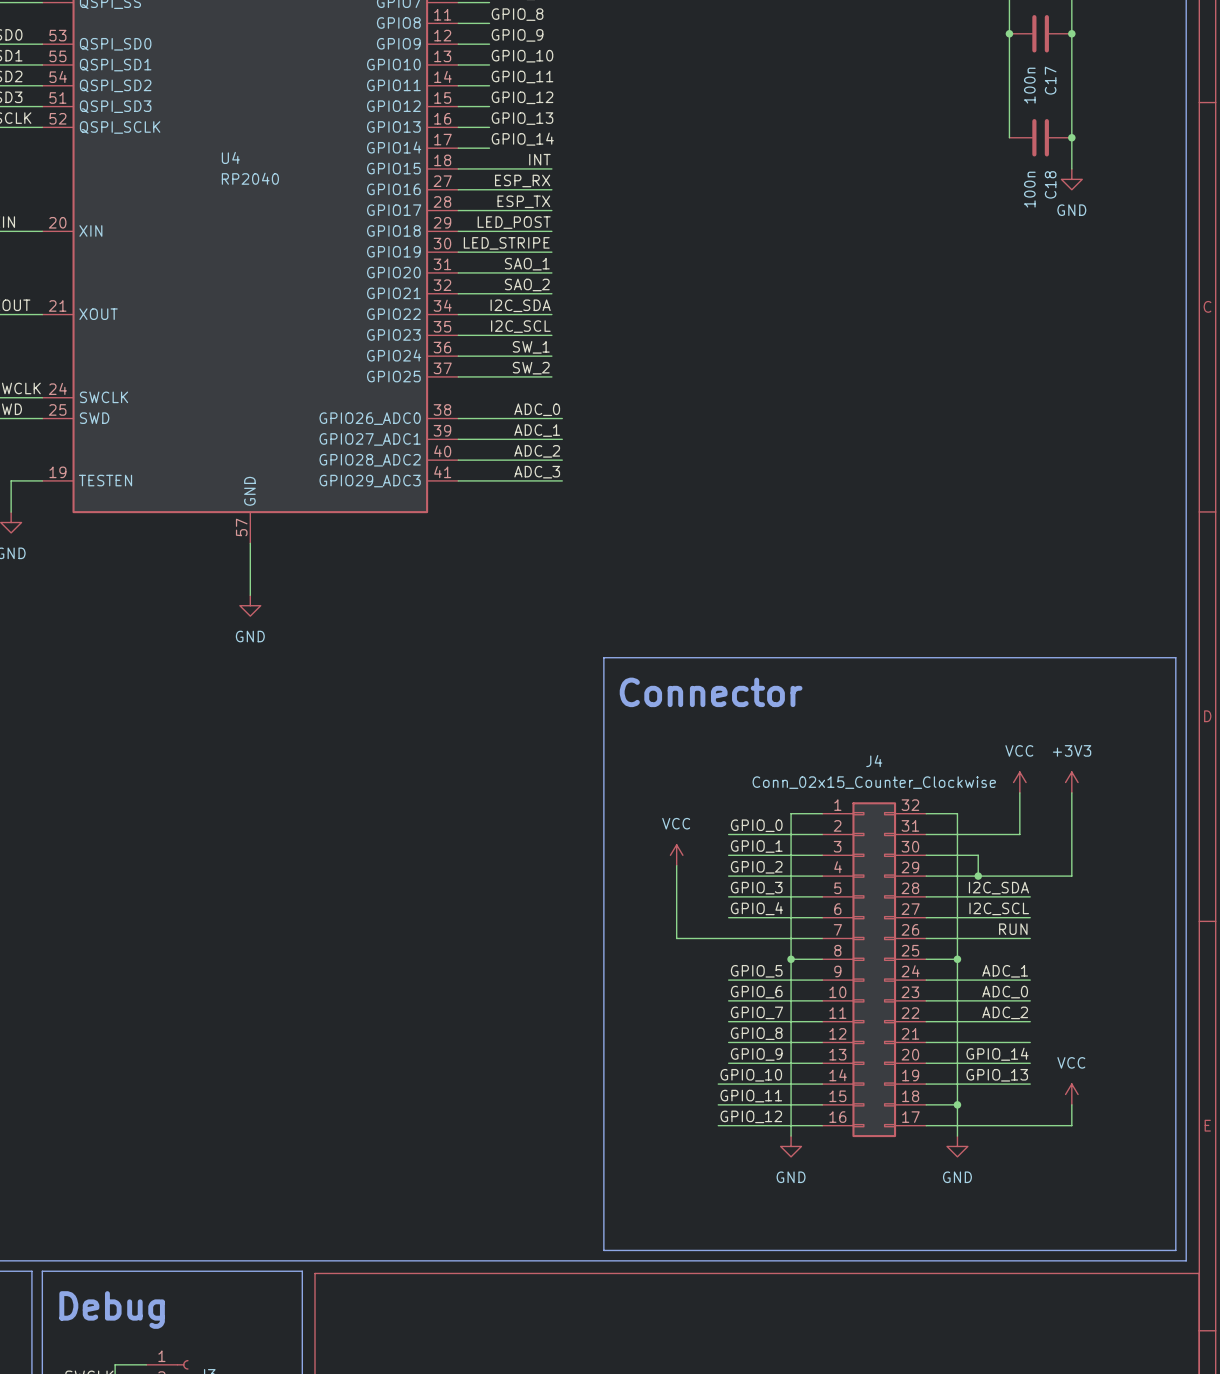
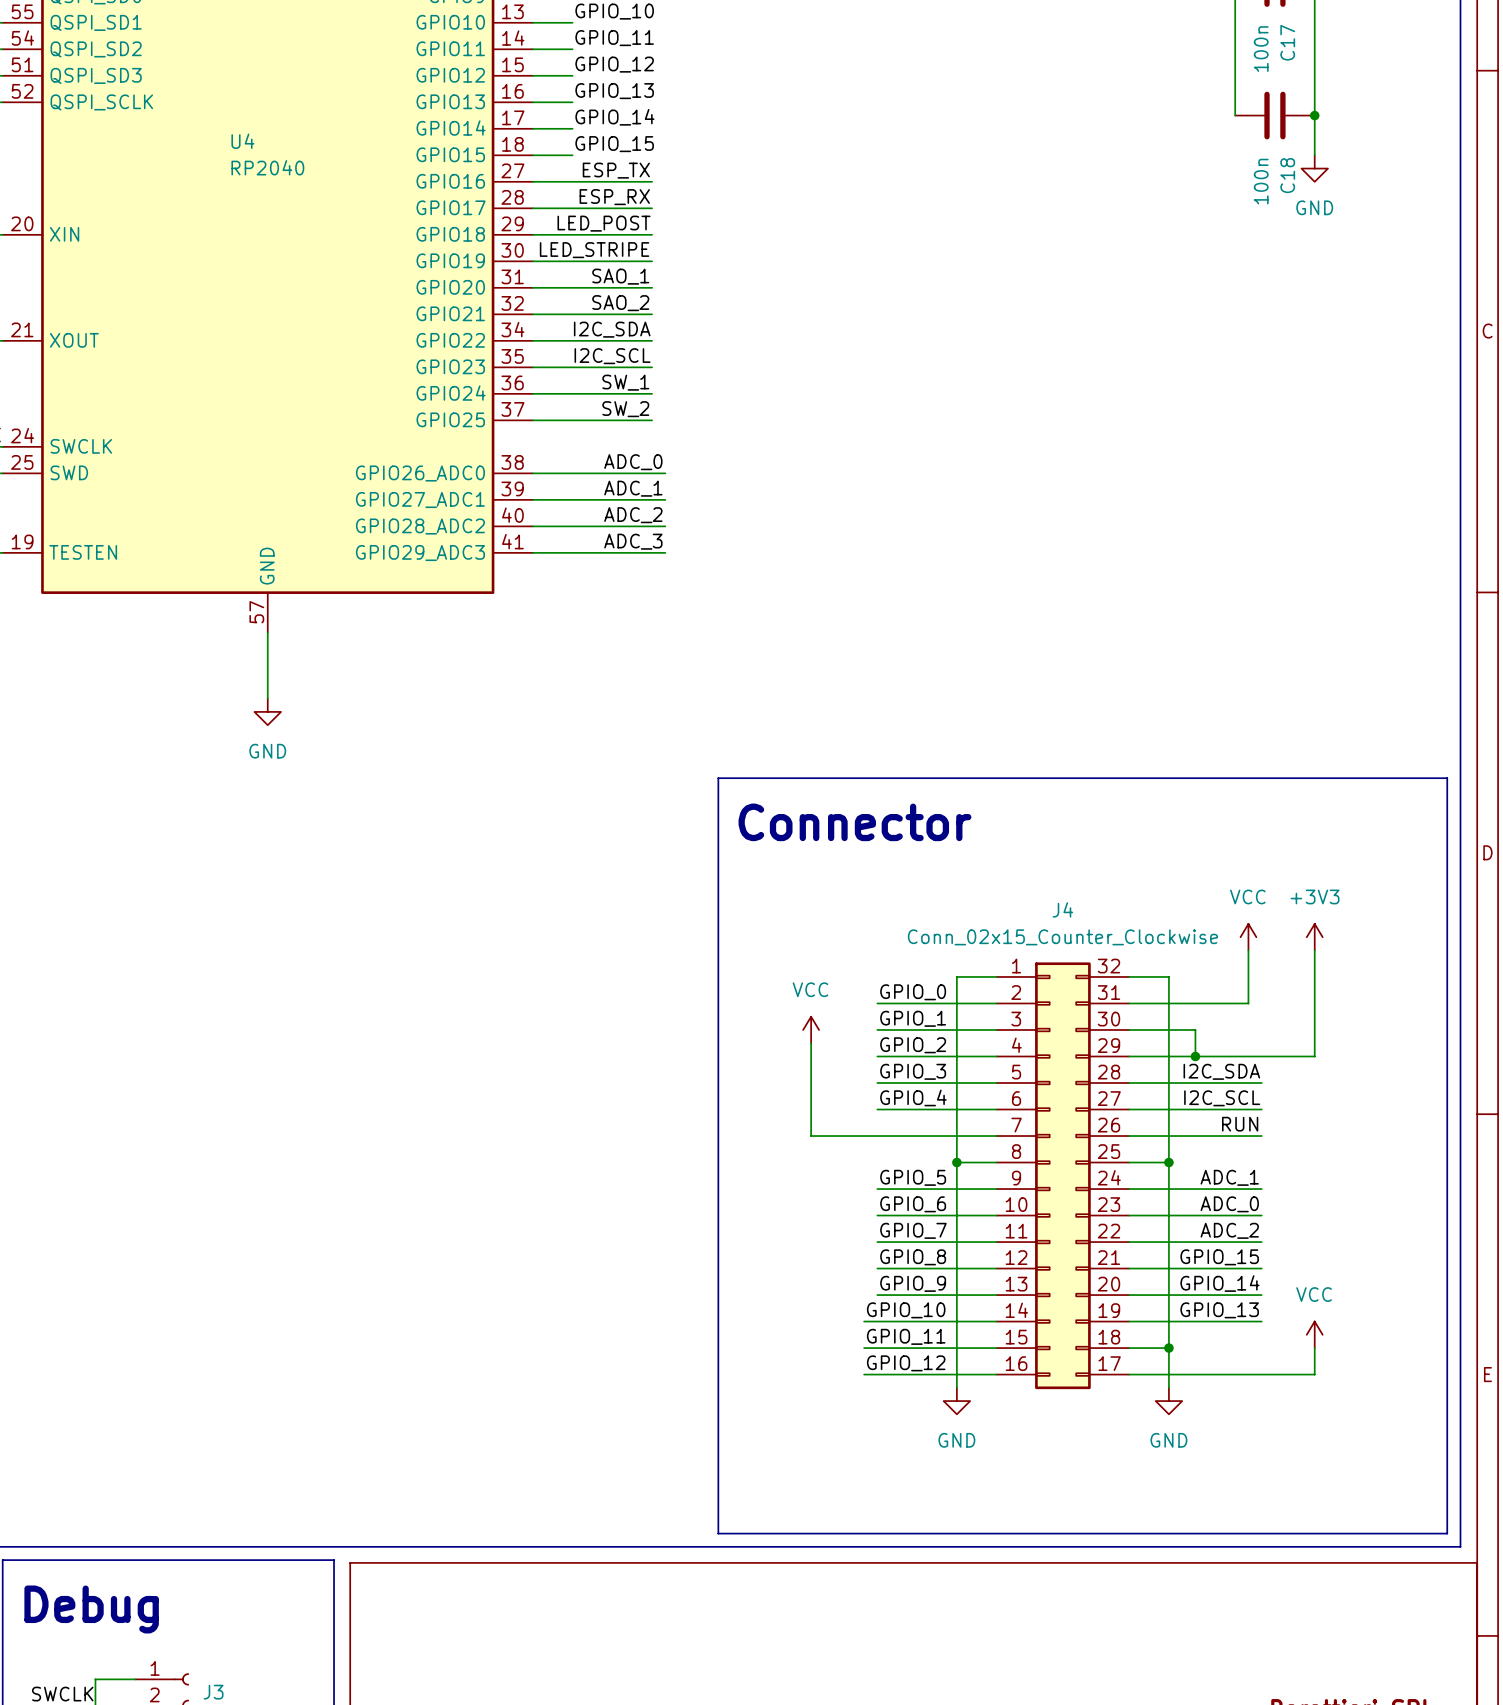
label: INT (539, 159) -> none
label: none -> GPIO_15 (614, 144)
wire: (489, 168) (551, 168) -> none
label: ESP_RX (522, 180) -> ESP_TX (616, 170)
label: ESP_TX (523, 201) -> ESP_RX (614, 197)
label: none -> GPIO_15 (1219, 1257)

